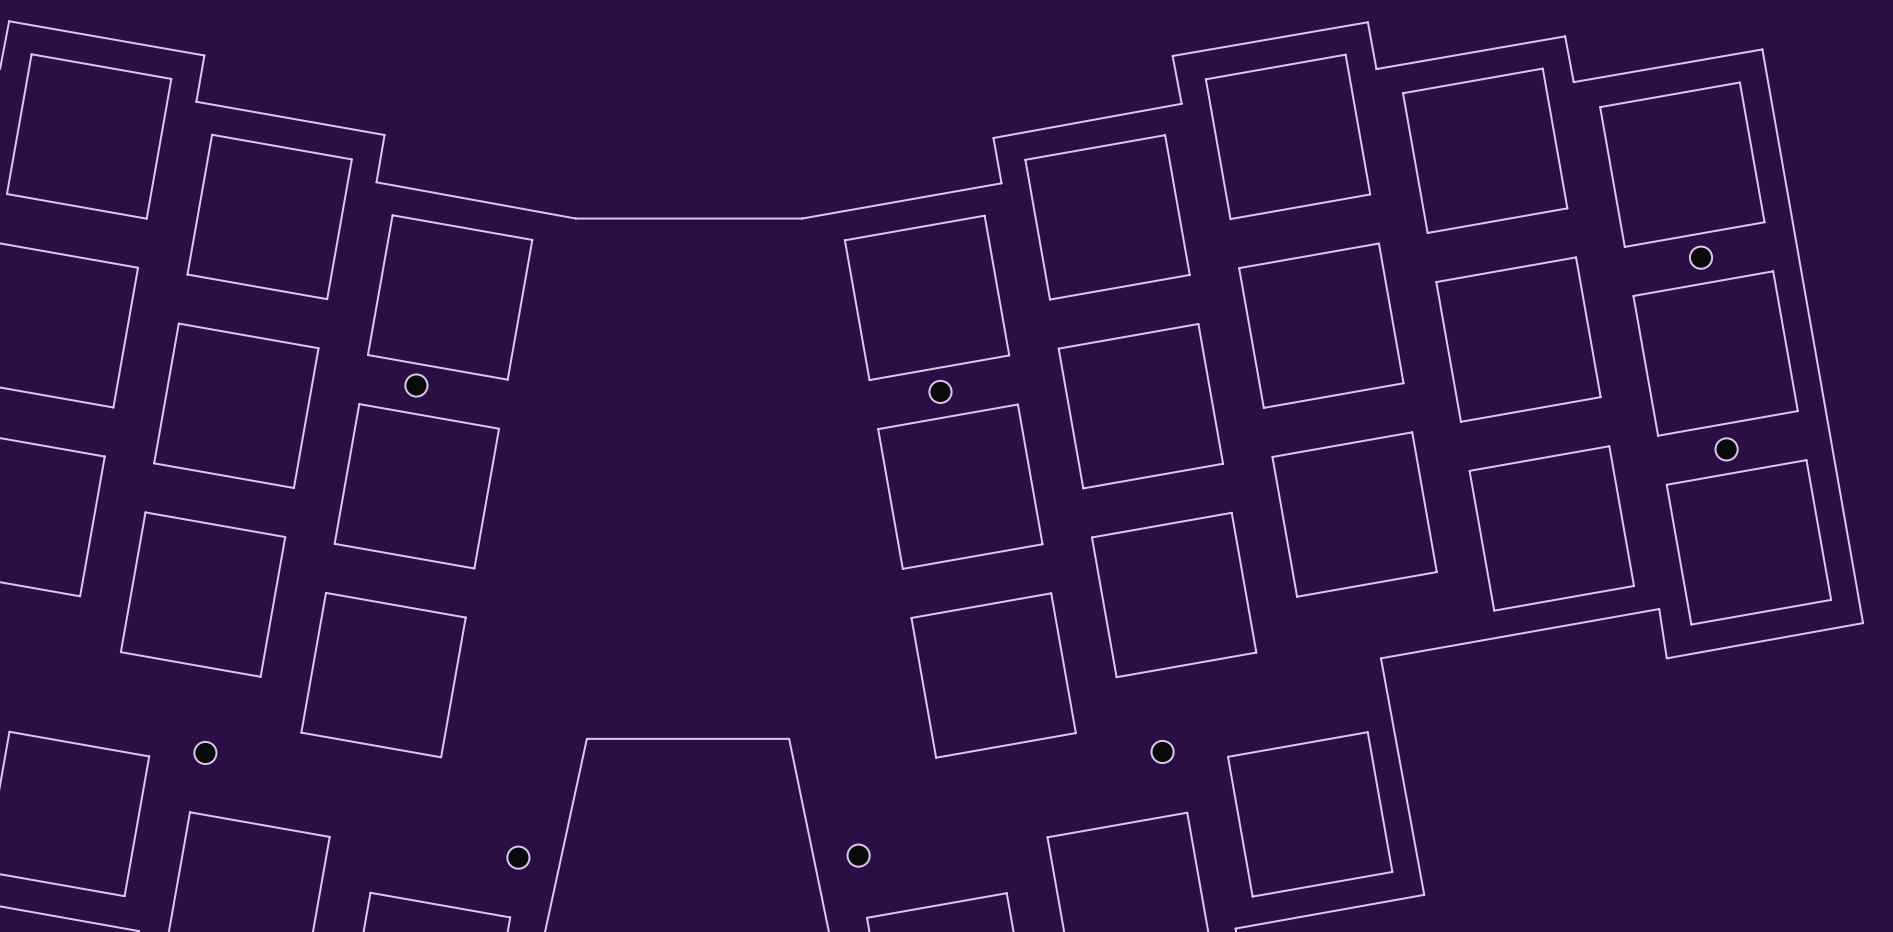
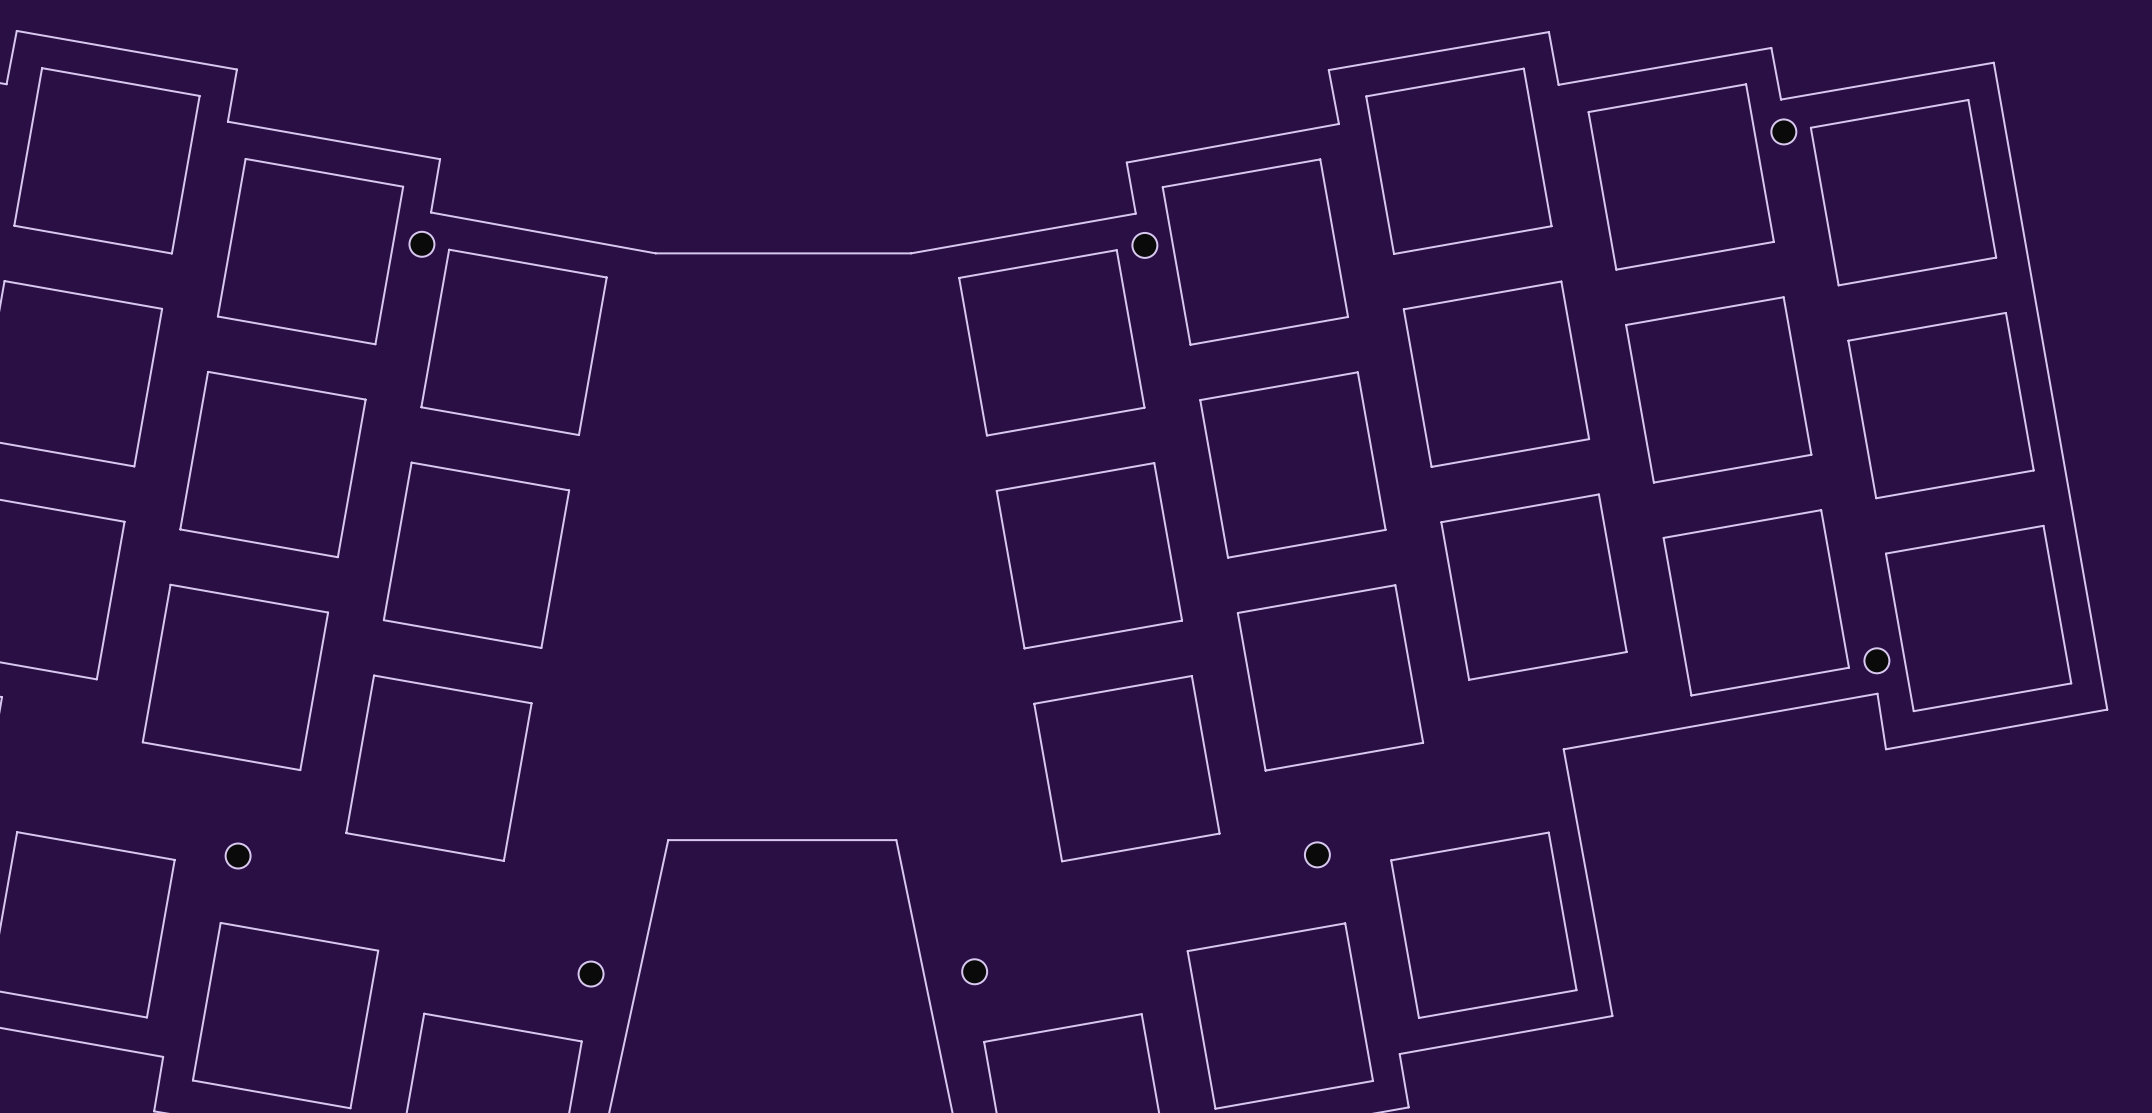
part: none -> (1783, 131)
part: (1701, 257) -> none
part position: (416, 385) -> (421, 244)
part position: (940, 391) -> (1144, 245)
part position: (1726, 449) -> (1876, 660)

